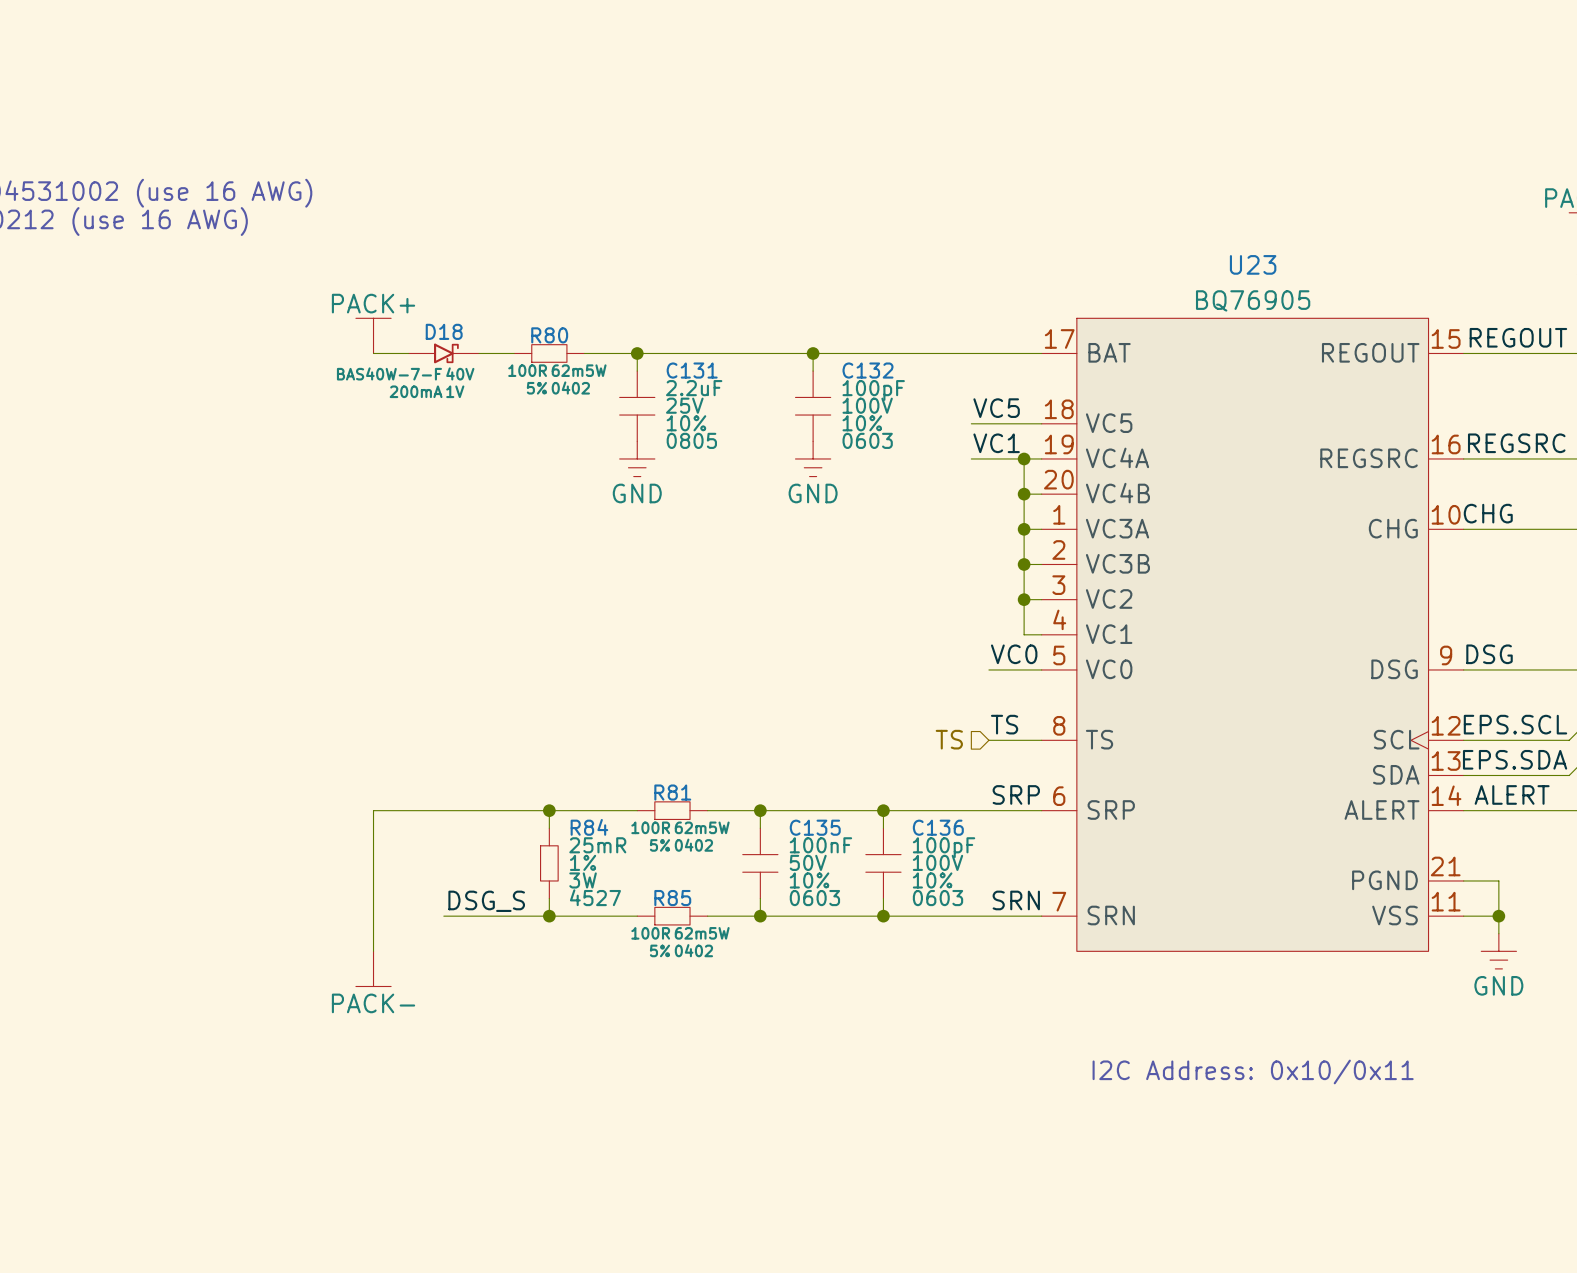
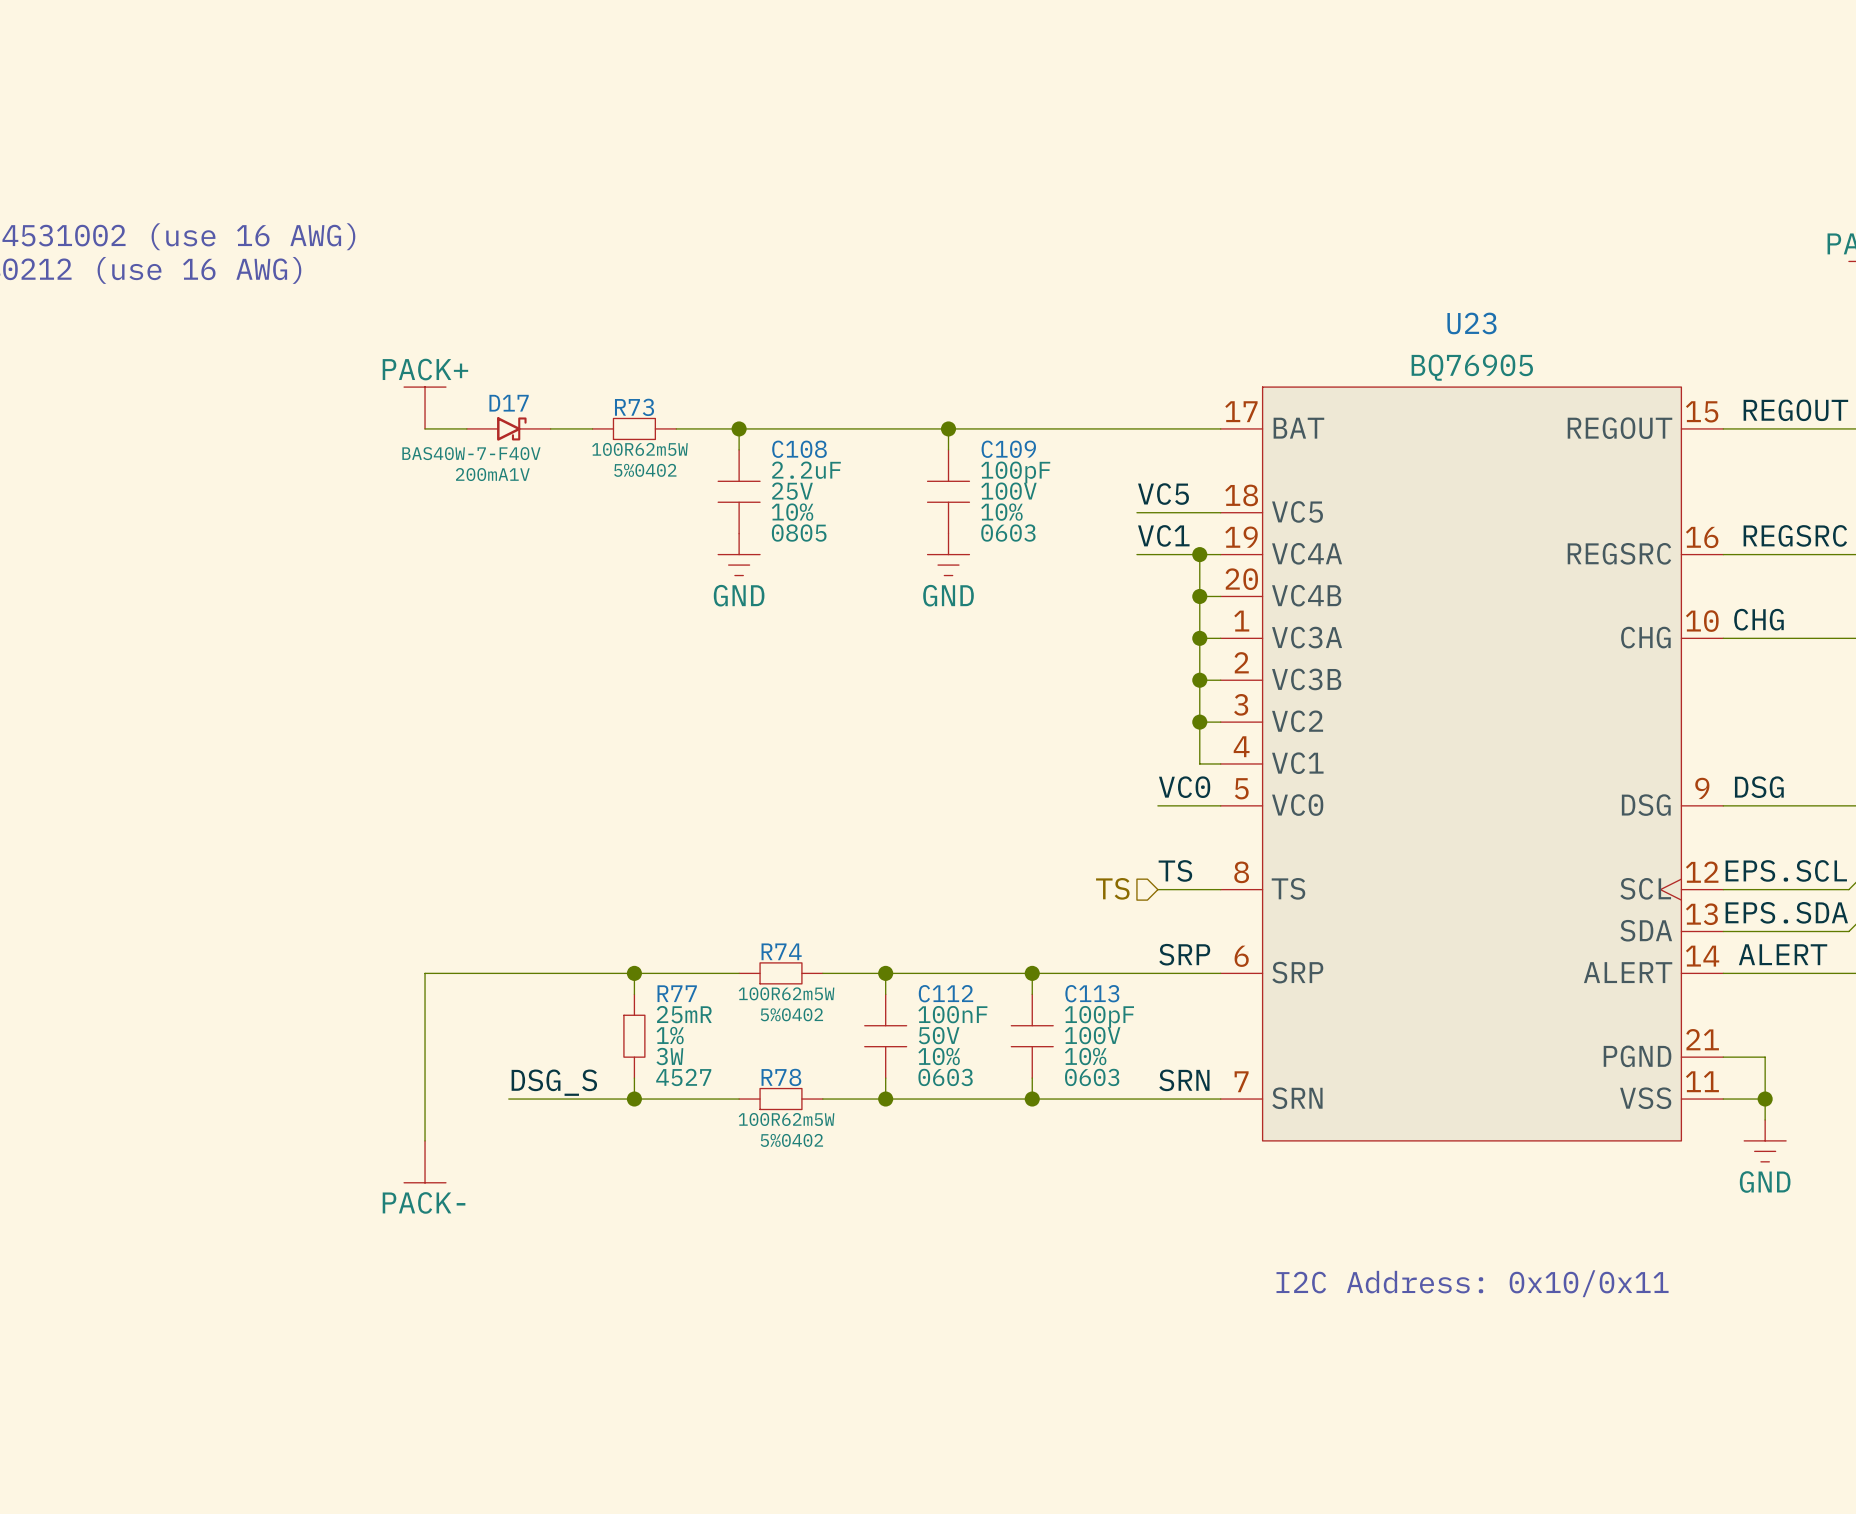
D18 name: D18 (444, 331) -> D17 (509, 403)
R80 name: R80 (549, 335) -> R73 (634, 407)
C131 name: C131 (692, 370) -> C108 (799, 449)
C132 name: C132 (867, 370) -> C109 (1008, 449)
R81 name: R81 (672, 792) -> R74 (781, 951)
R84 name: R84 (589, 827) -> R77 (677, 993)
C135 name: C135 (815, 827) -> C112 (945, 993)
C136 name: C136 (938, 827) -> C113 (1092, 993)
R85 name: R85 (672, 898) -> R78 (781, 1077)

